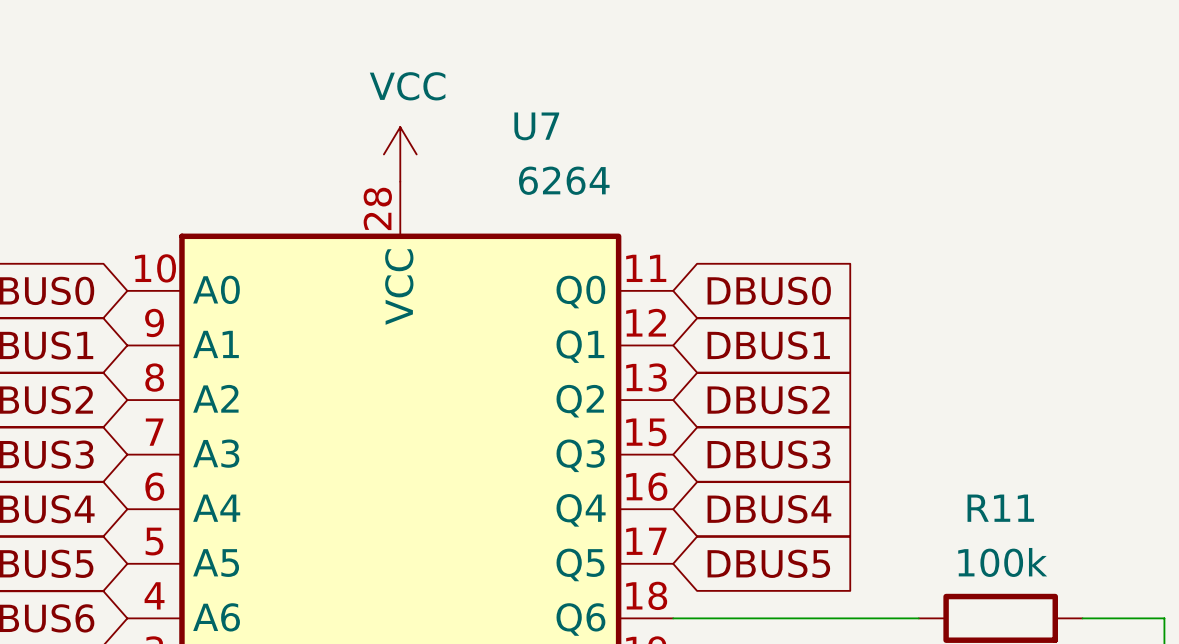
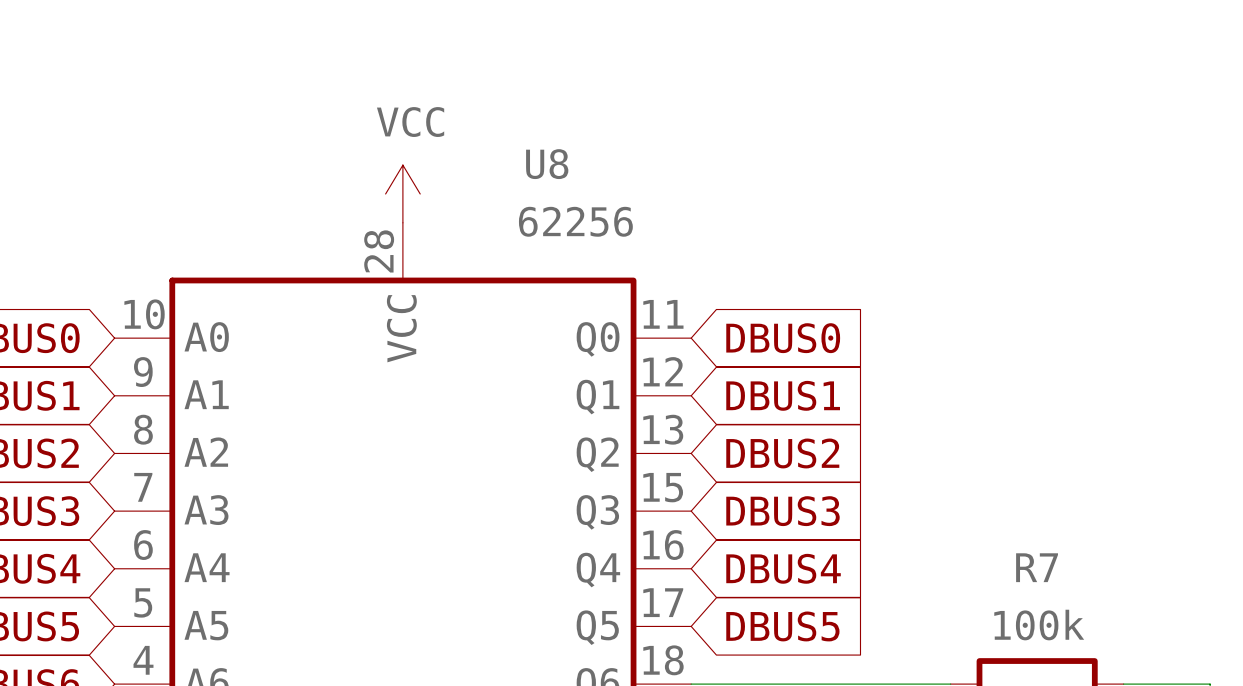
U7 name: U7 (536, 126) -> U8 (547, 164)
U7 value: 6264 (564, 180) -> 62256 (575, 221)
R11 name: R11 (1000, 508) -> R7 (1037, 567)

